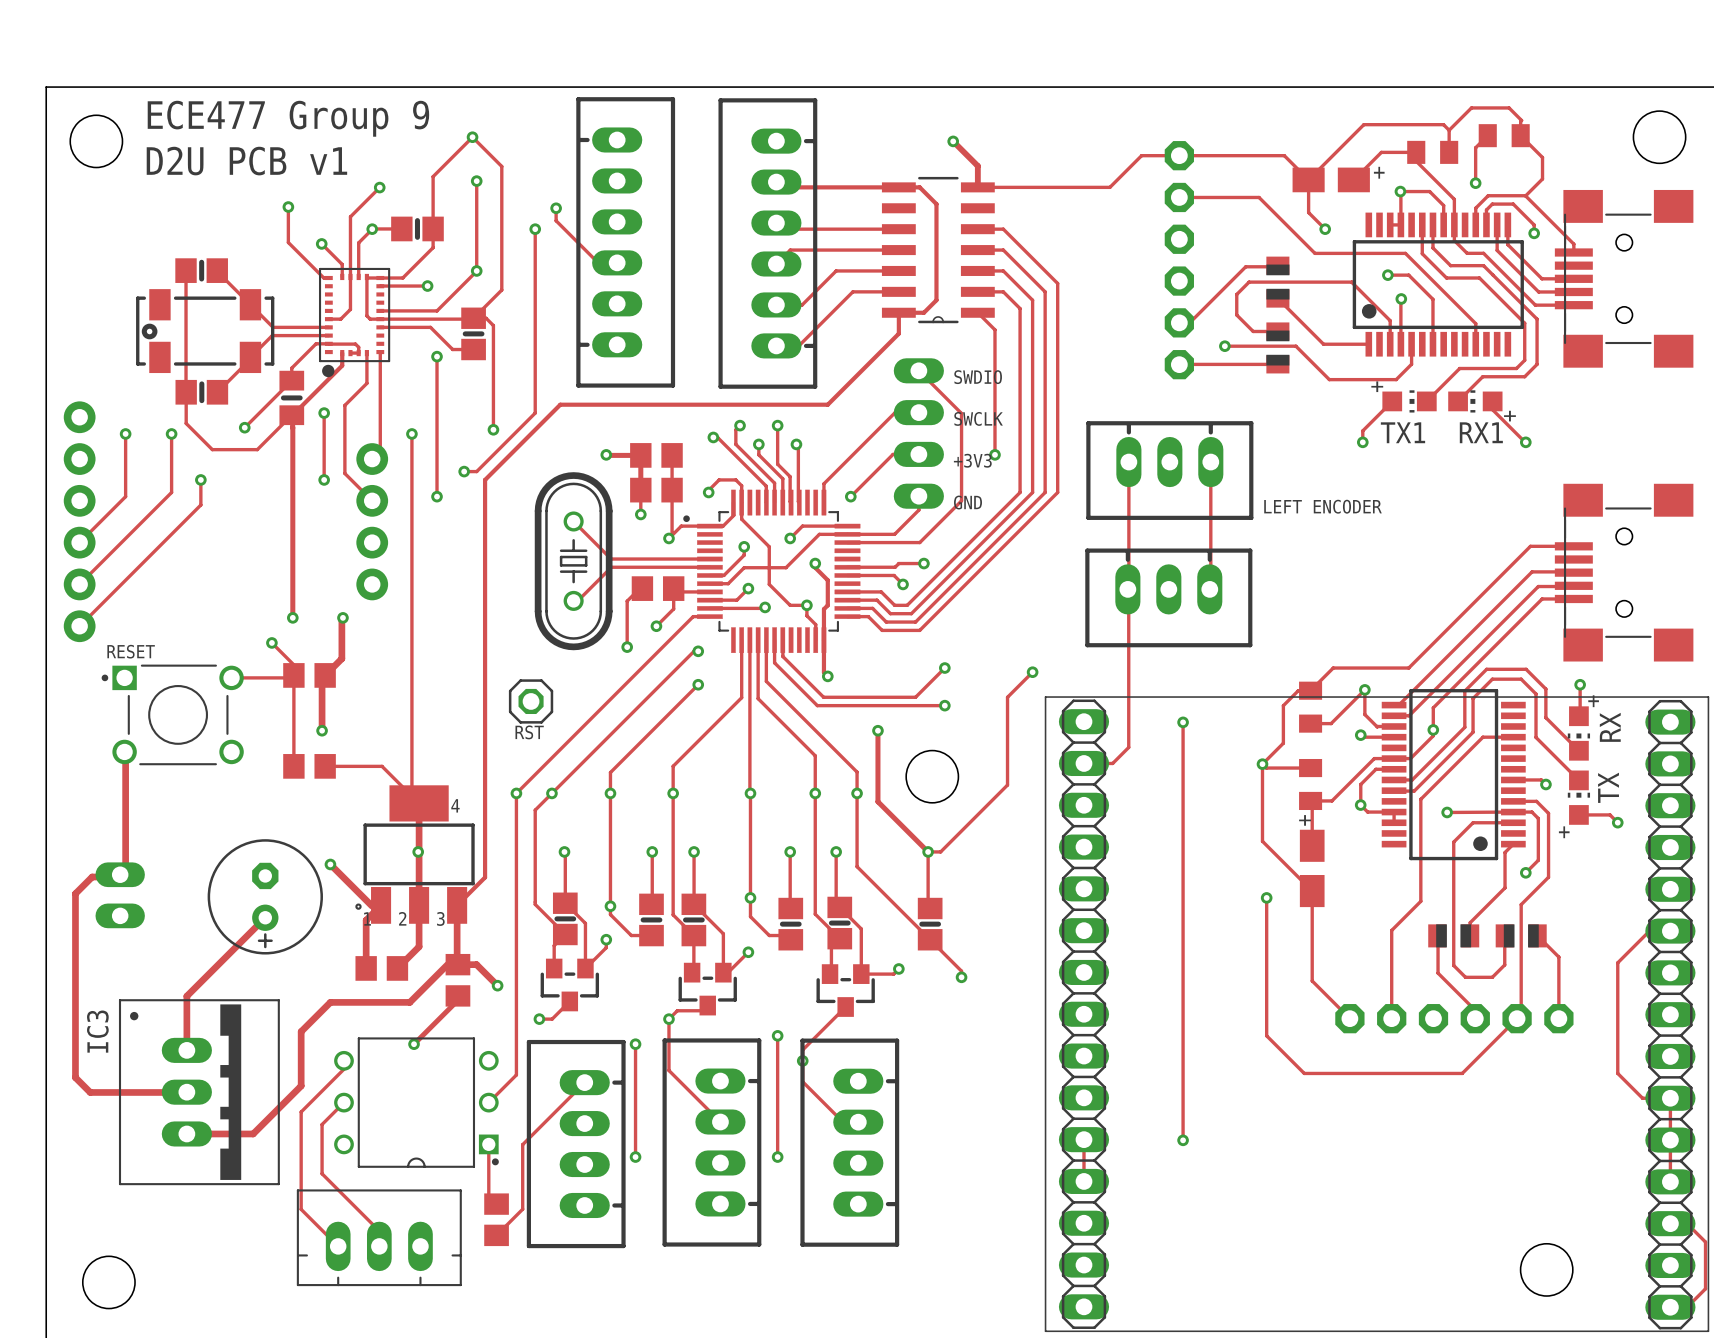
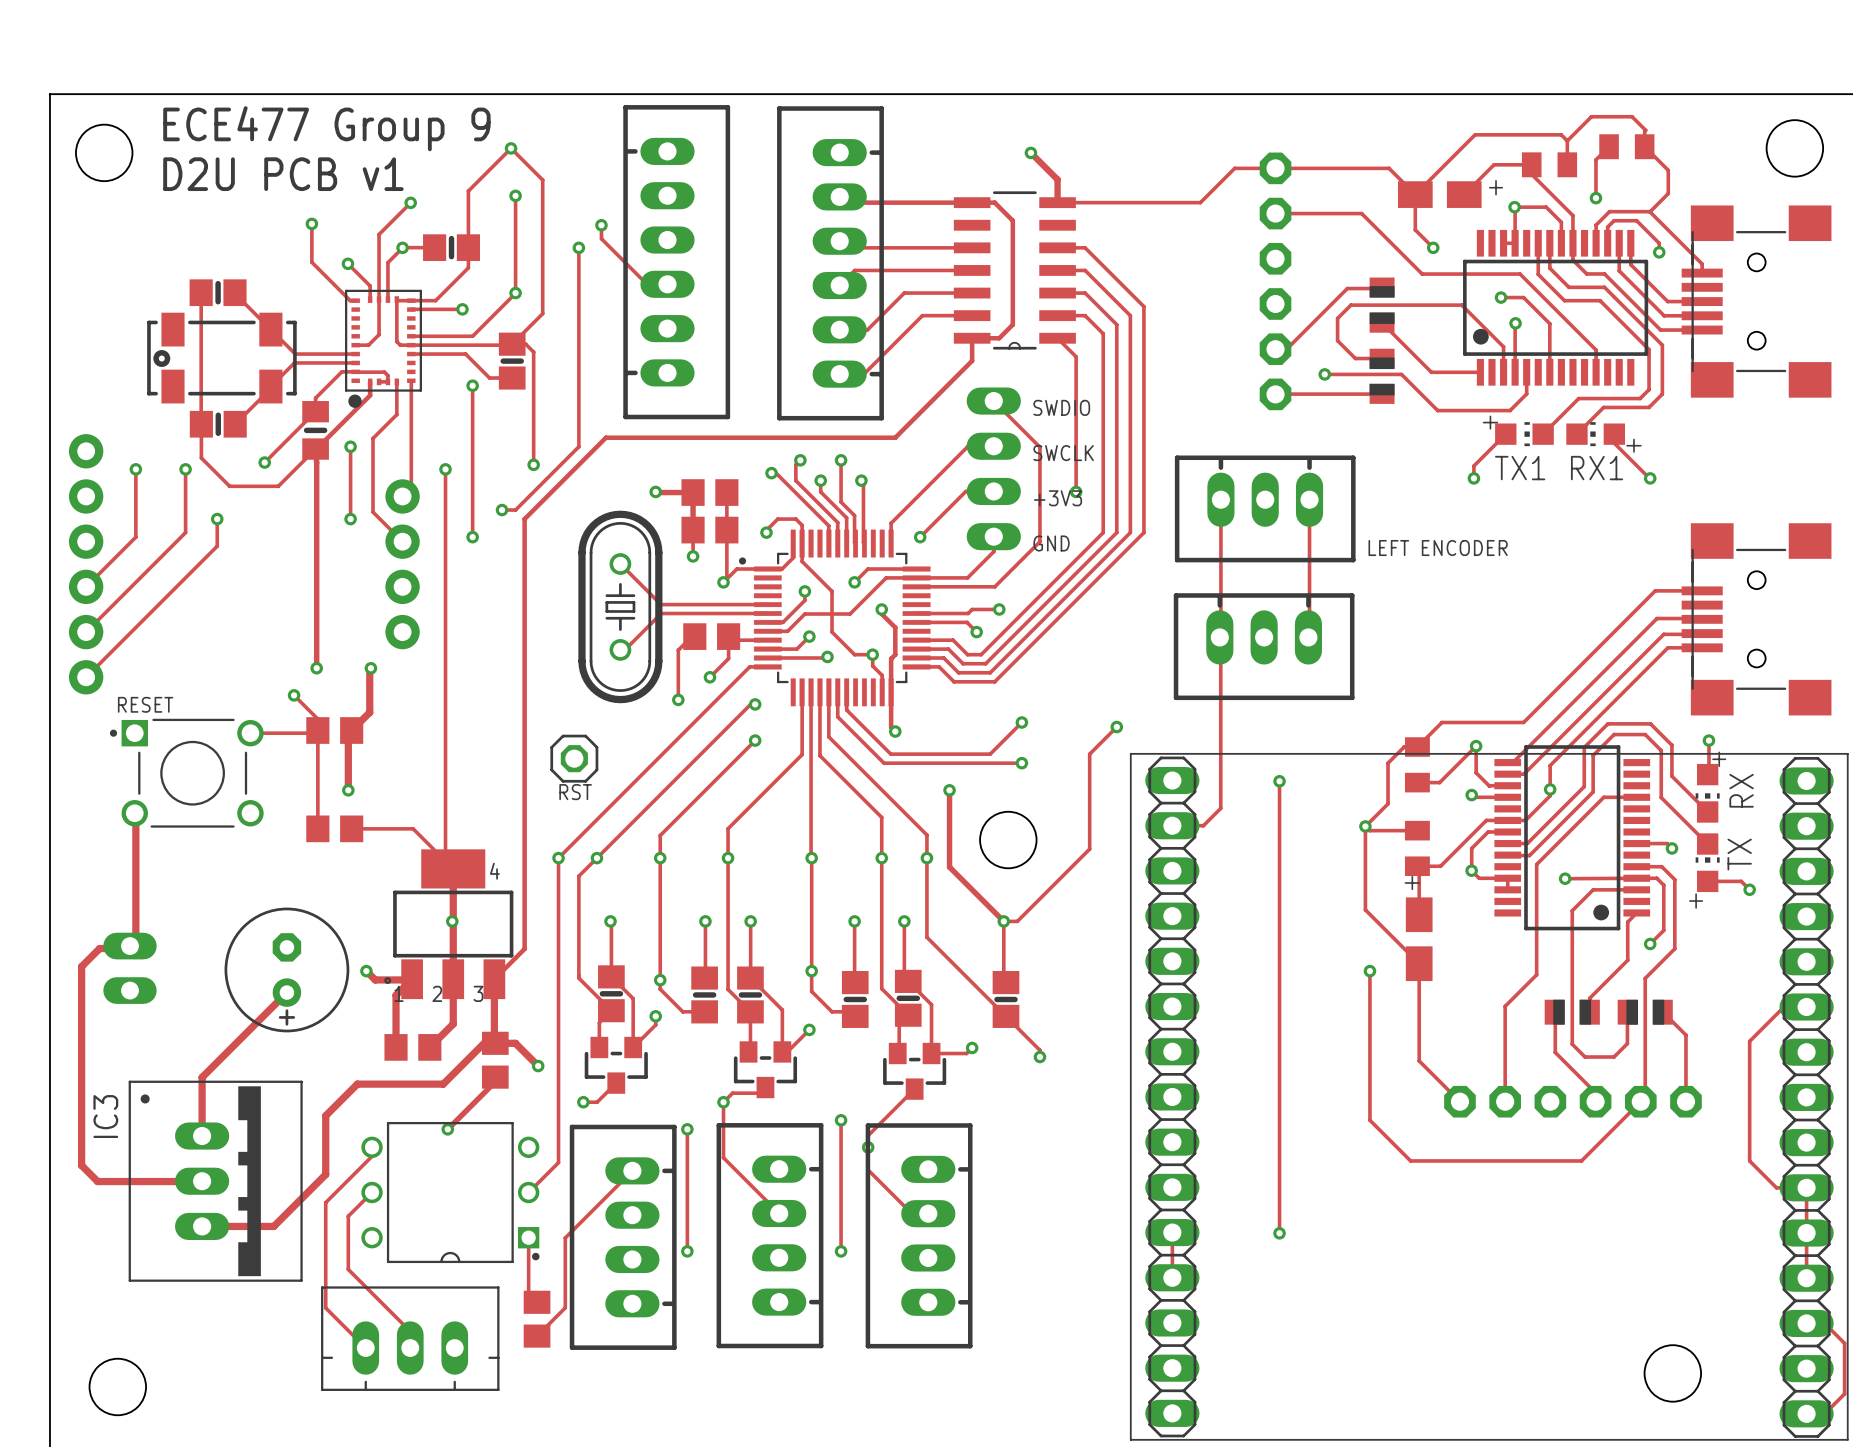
track: (330, 864) (372, 906) -> (366, 971) (375, 979) (402, 979)
via position: (330, 864) -> (366, 971)

